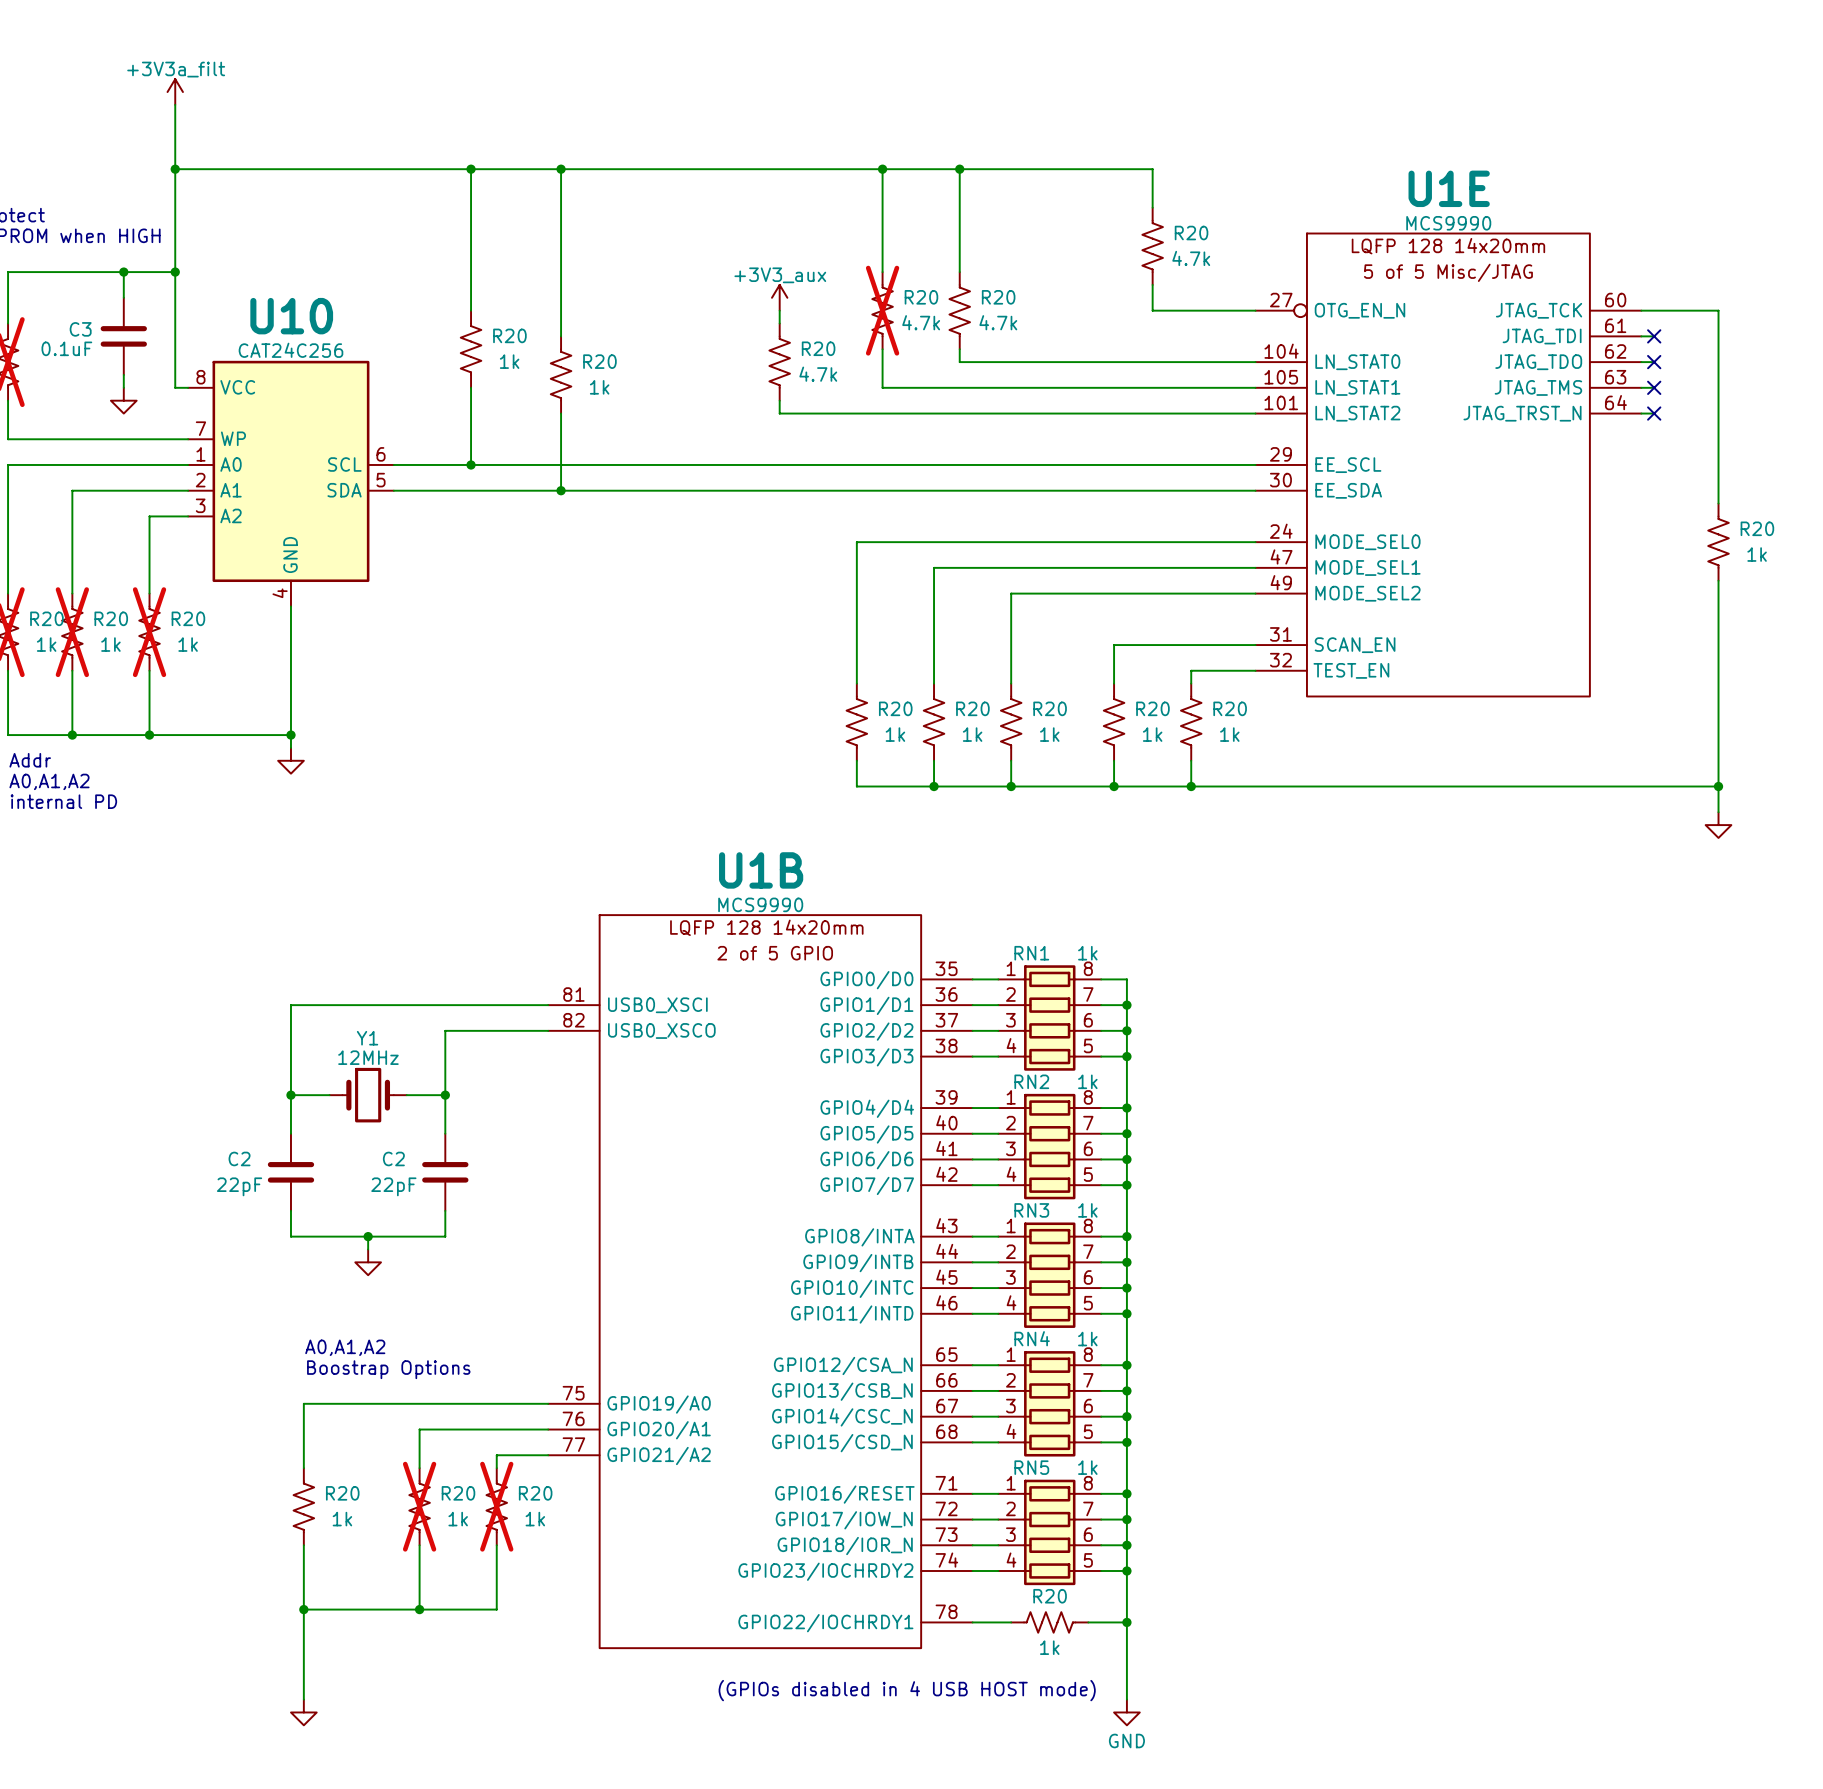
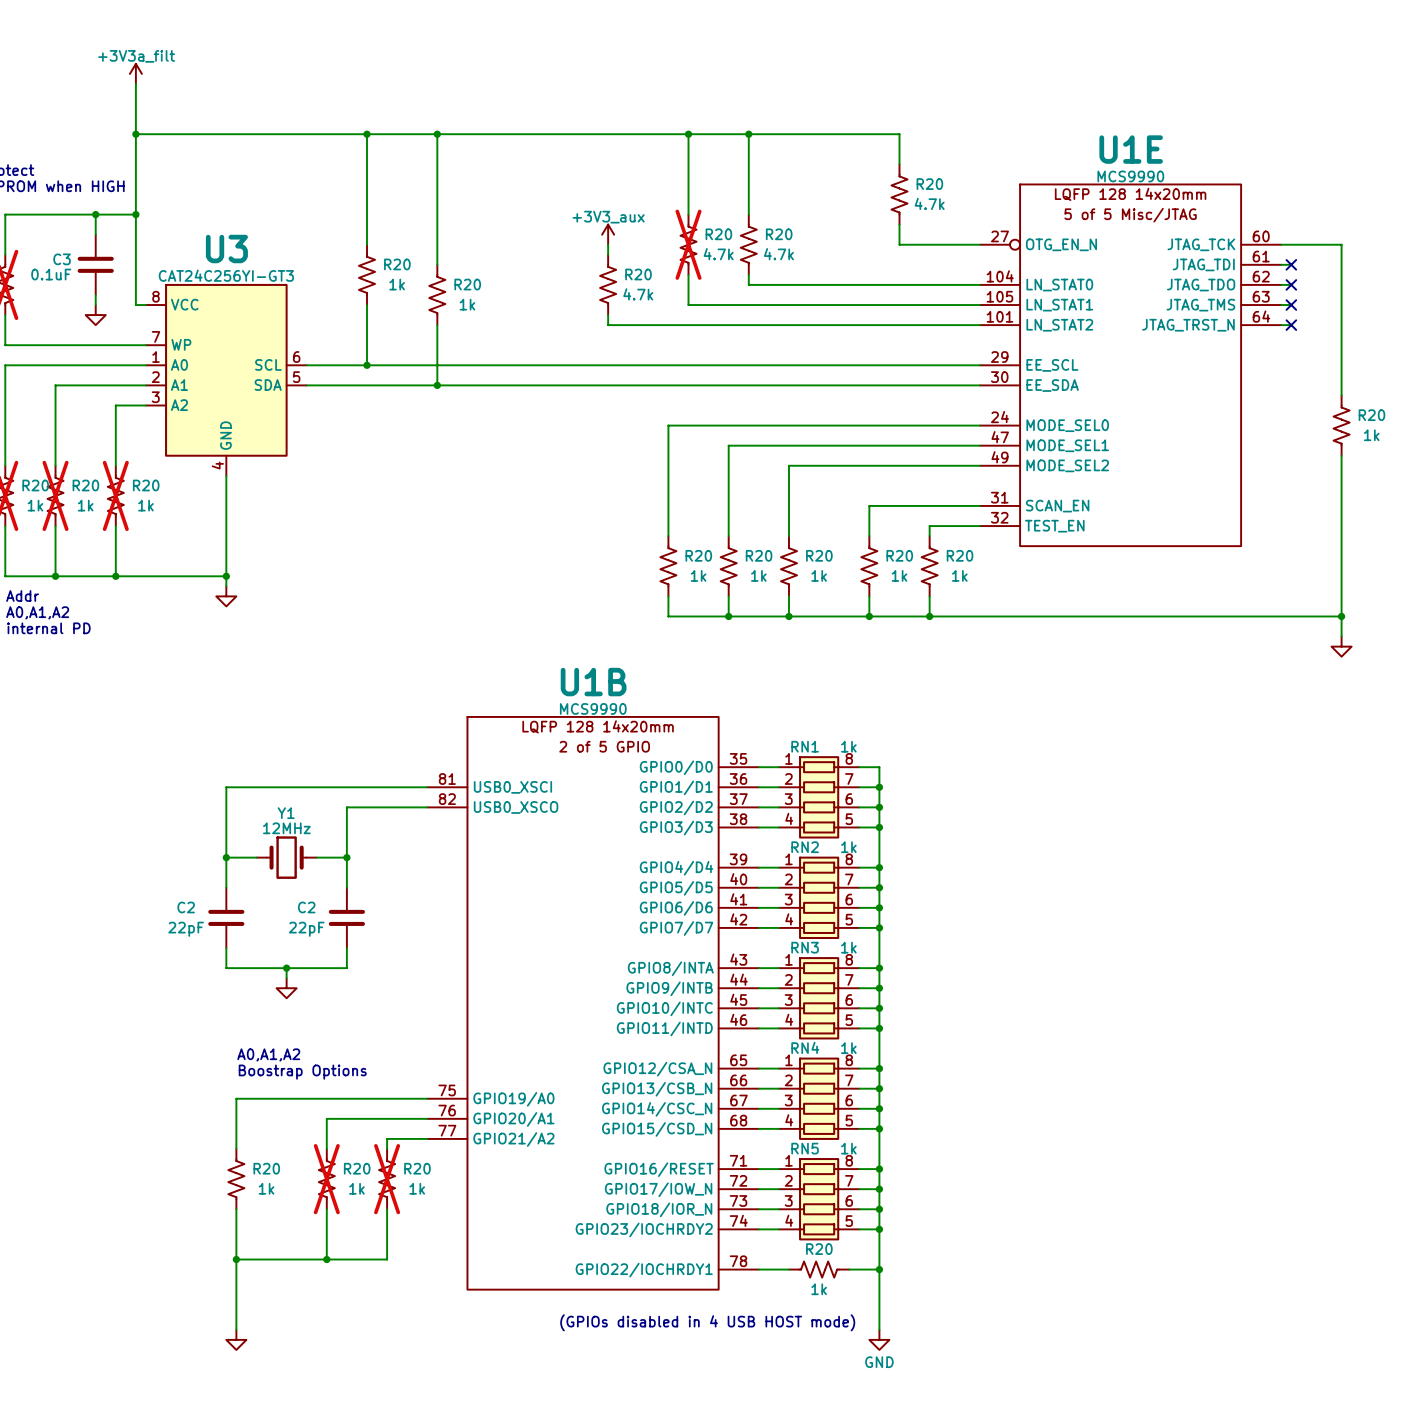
U10 name: U10 (291, 316) -> U3 (226, 249)
U10 value: CAT24C256 (290, 350) -> CAT24C256YI-GT3 (226, 275)

